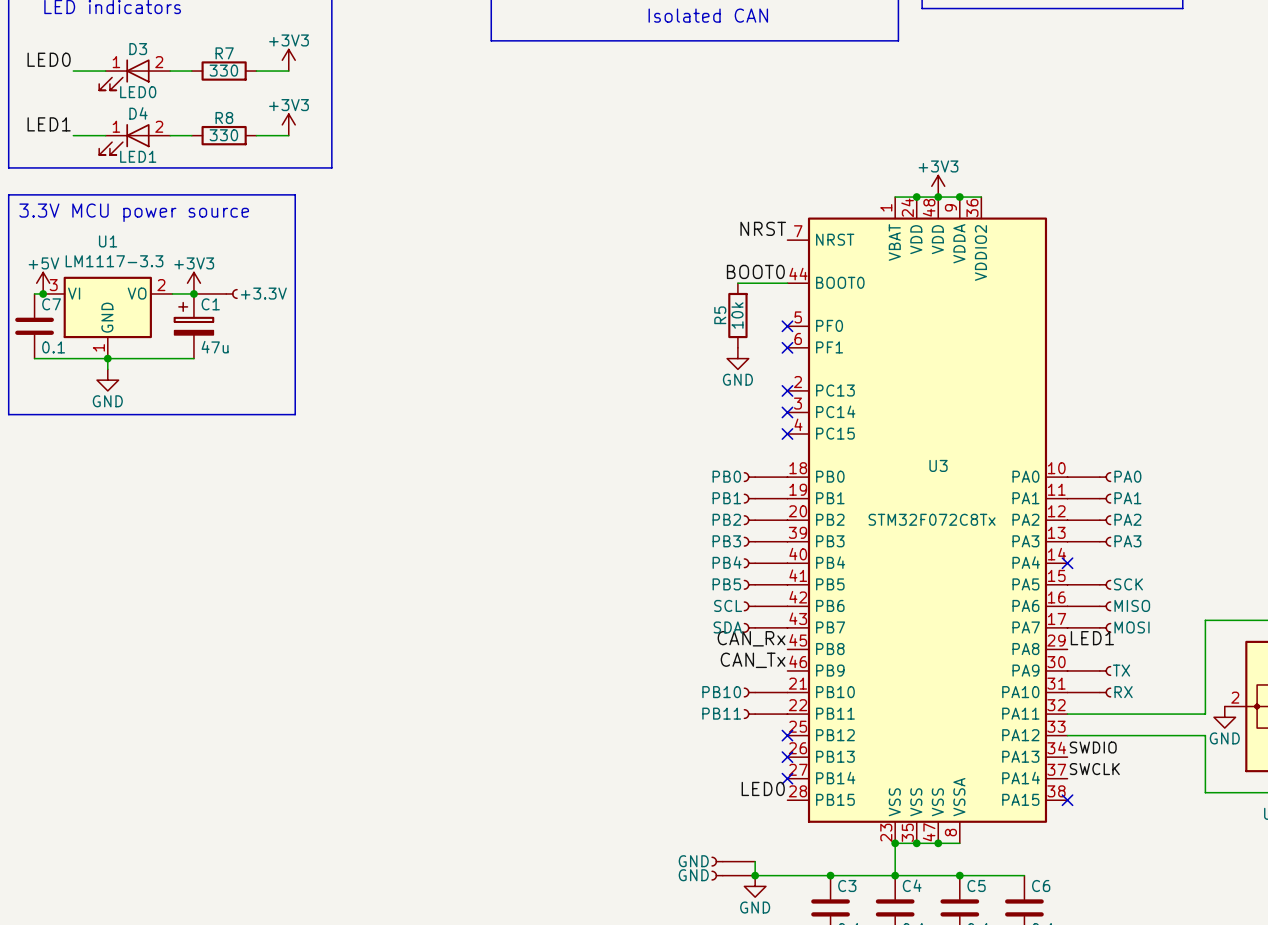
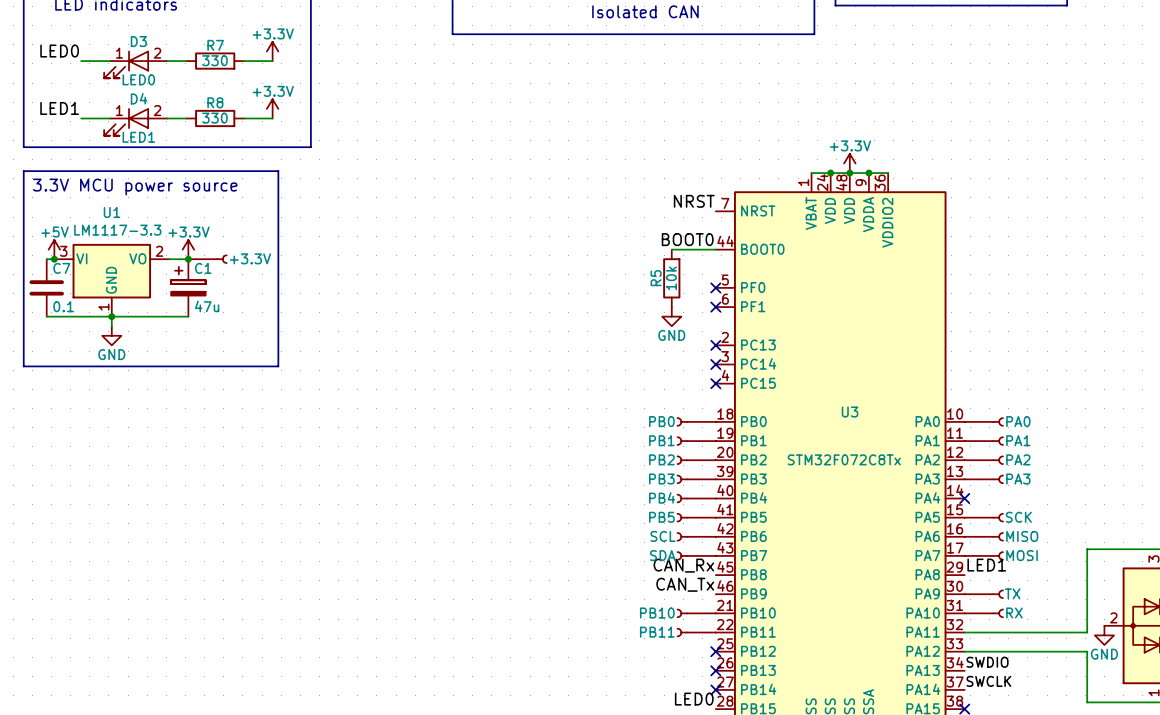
power symbol: +3V3 (288, 60) -> +3.3V (272, 51)
power symbol: +3V3 (288, 124) -> +3.3V (272, 108)
power symbol: +3V3 (938, 186) -> +3.3V (849, 163)
power symbol: +3V3 (193, 283) -> +3.3V (188, 249)

